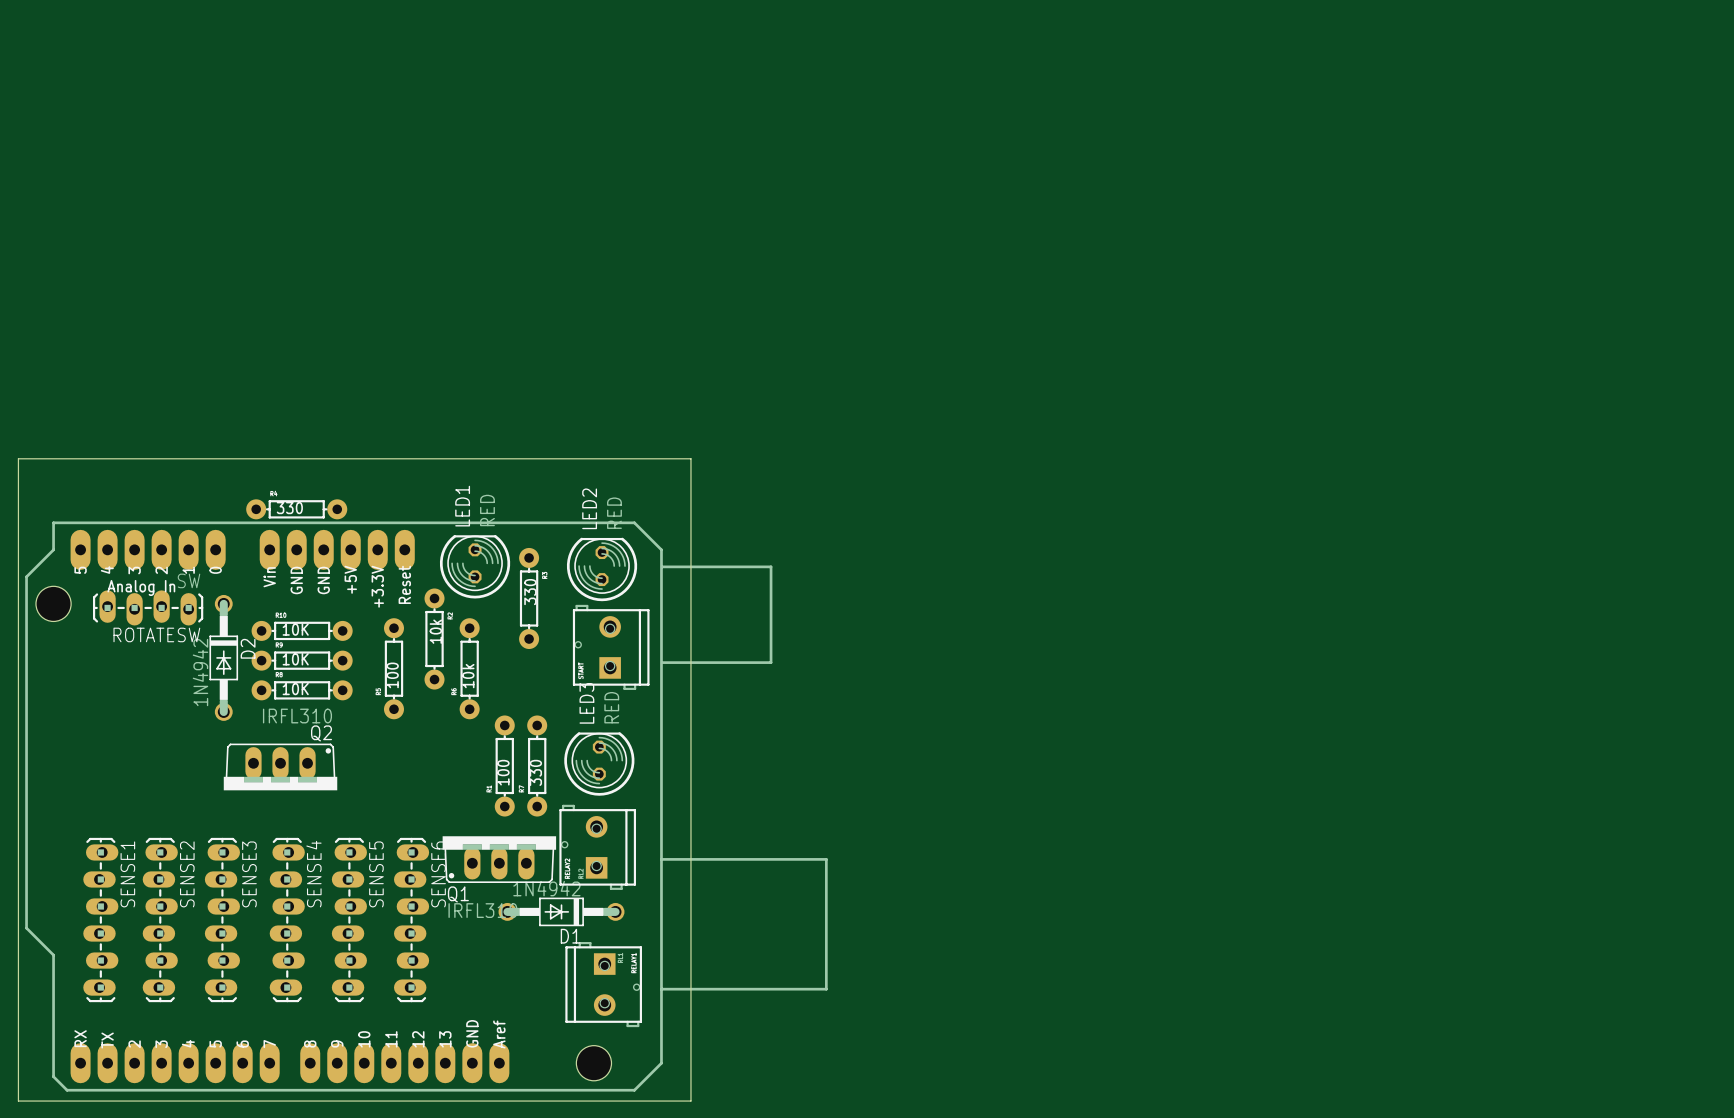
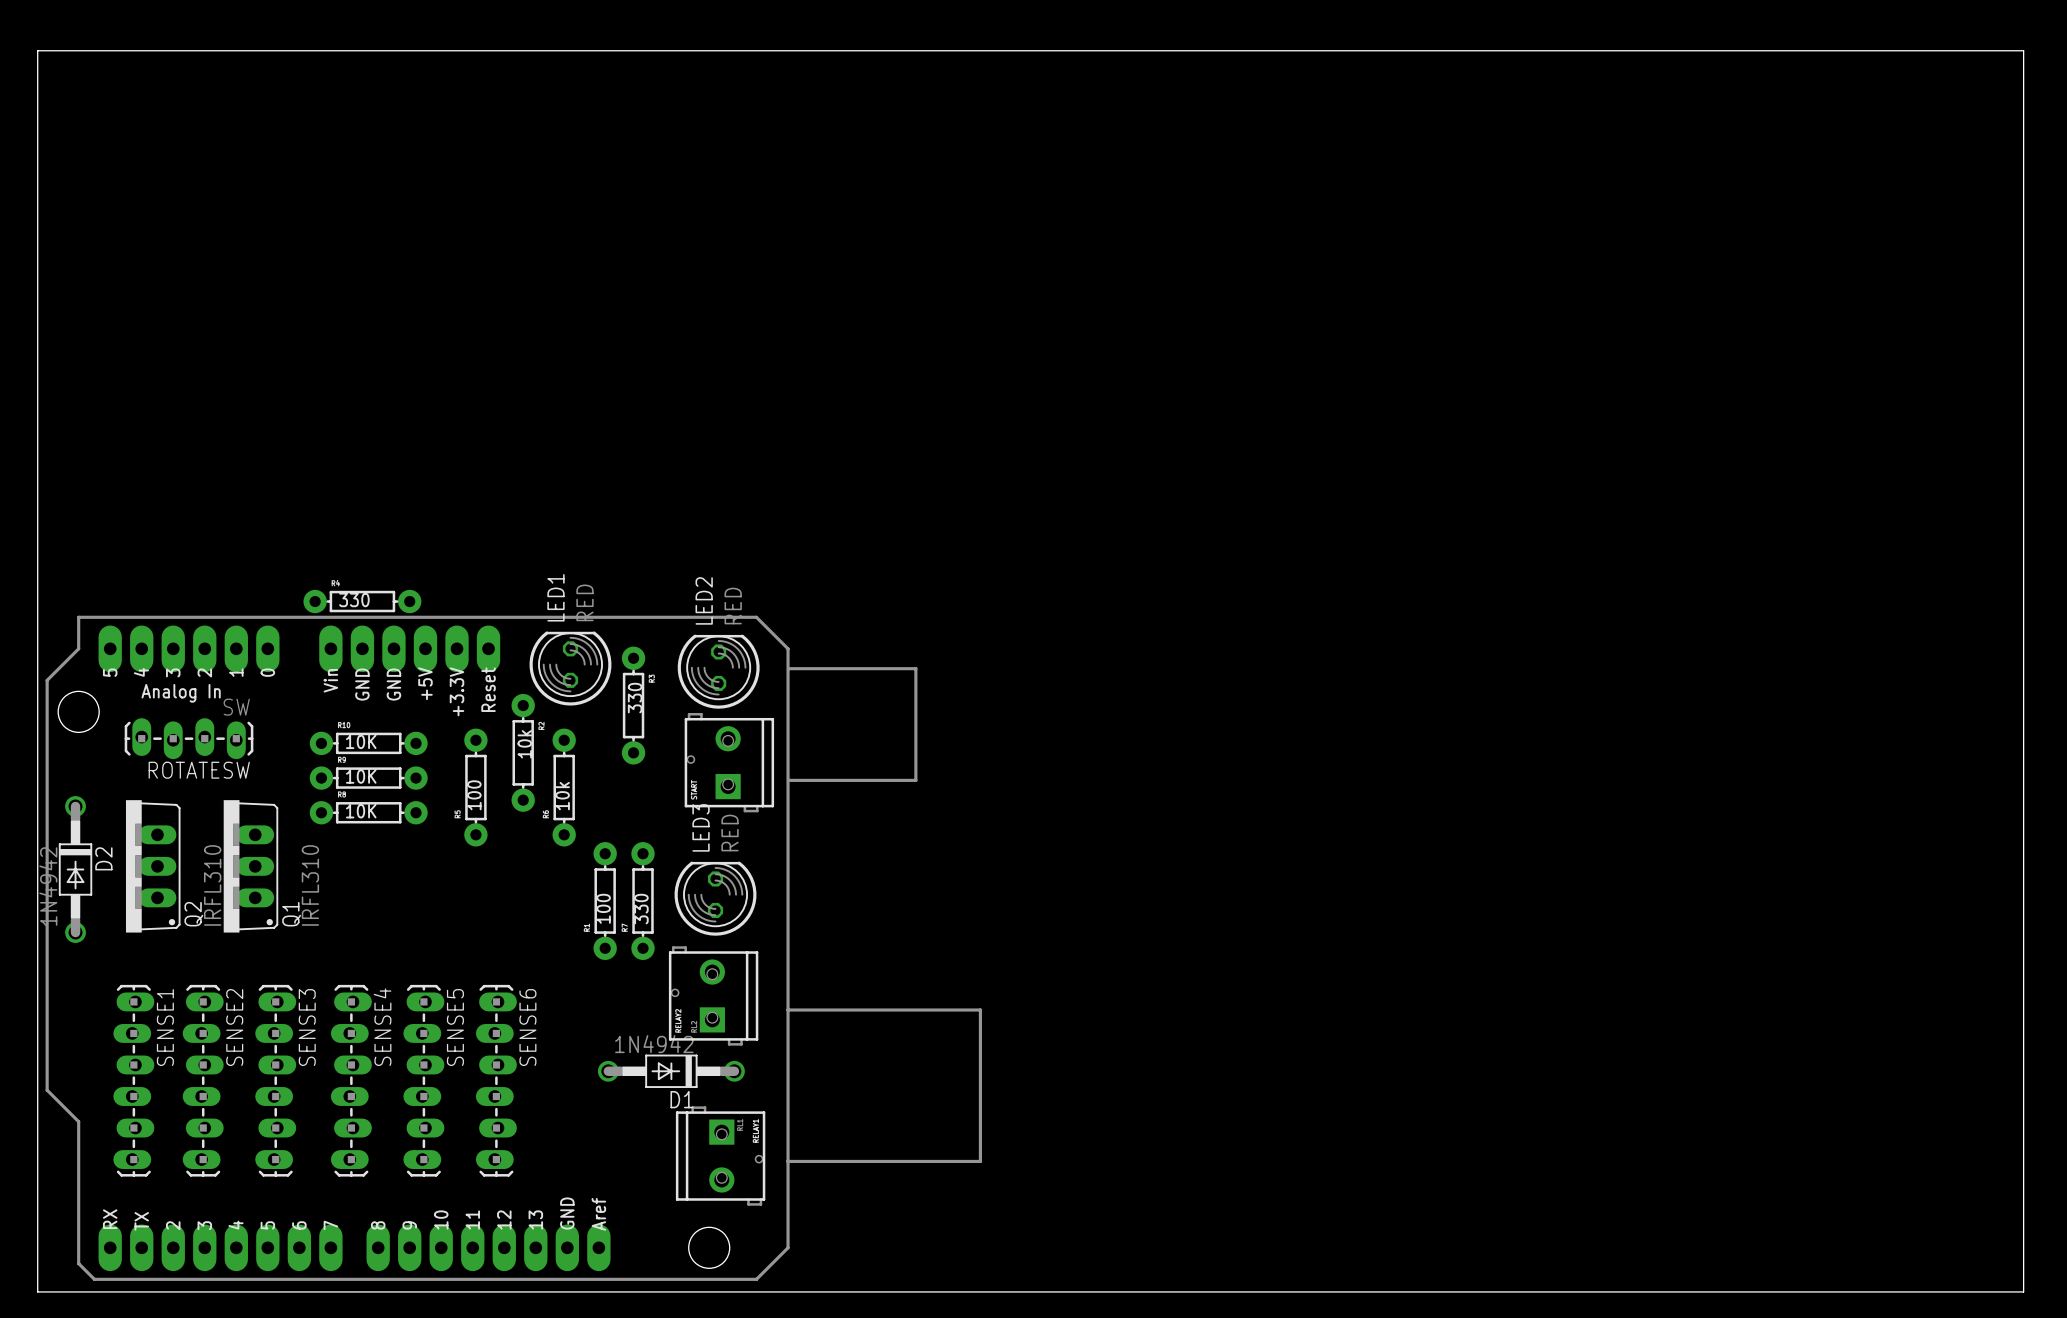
board edge: (18, 458) (690, 458) (690, 1101) -> (37, 542) (37, 50) (2023, 50) (2023, 1291) (822, 1291)
ROTATESW position: (148, 607) -> (189, 738)
D2 position: (223, 657) -> (75, 869)
Q2 rotation: 0° (280, 766) -> 90° clockwise (153, 866)
Q2 position: (280, 766) -> (153, 866)
Q1 rotation: 0° (499, 859) -> 90° counterclockwise (250, 866)
Q1 position: (499, 859) -> (250, 866)

